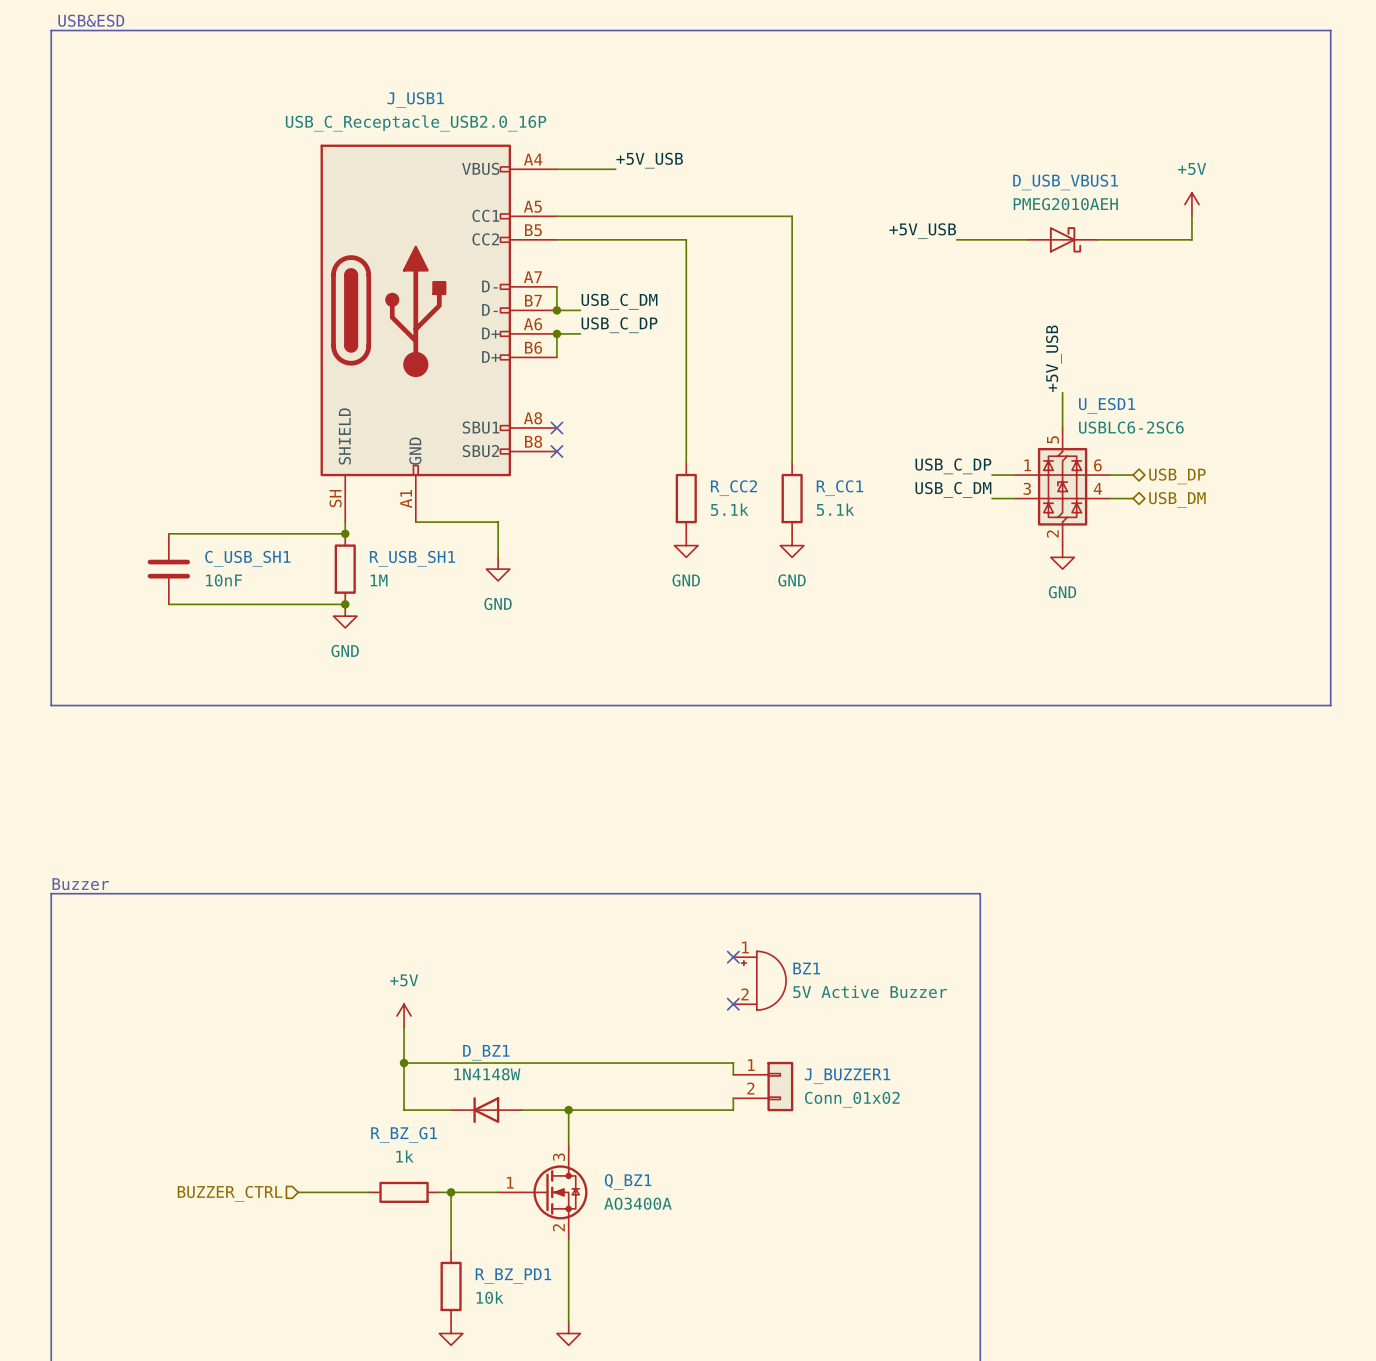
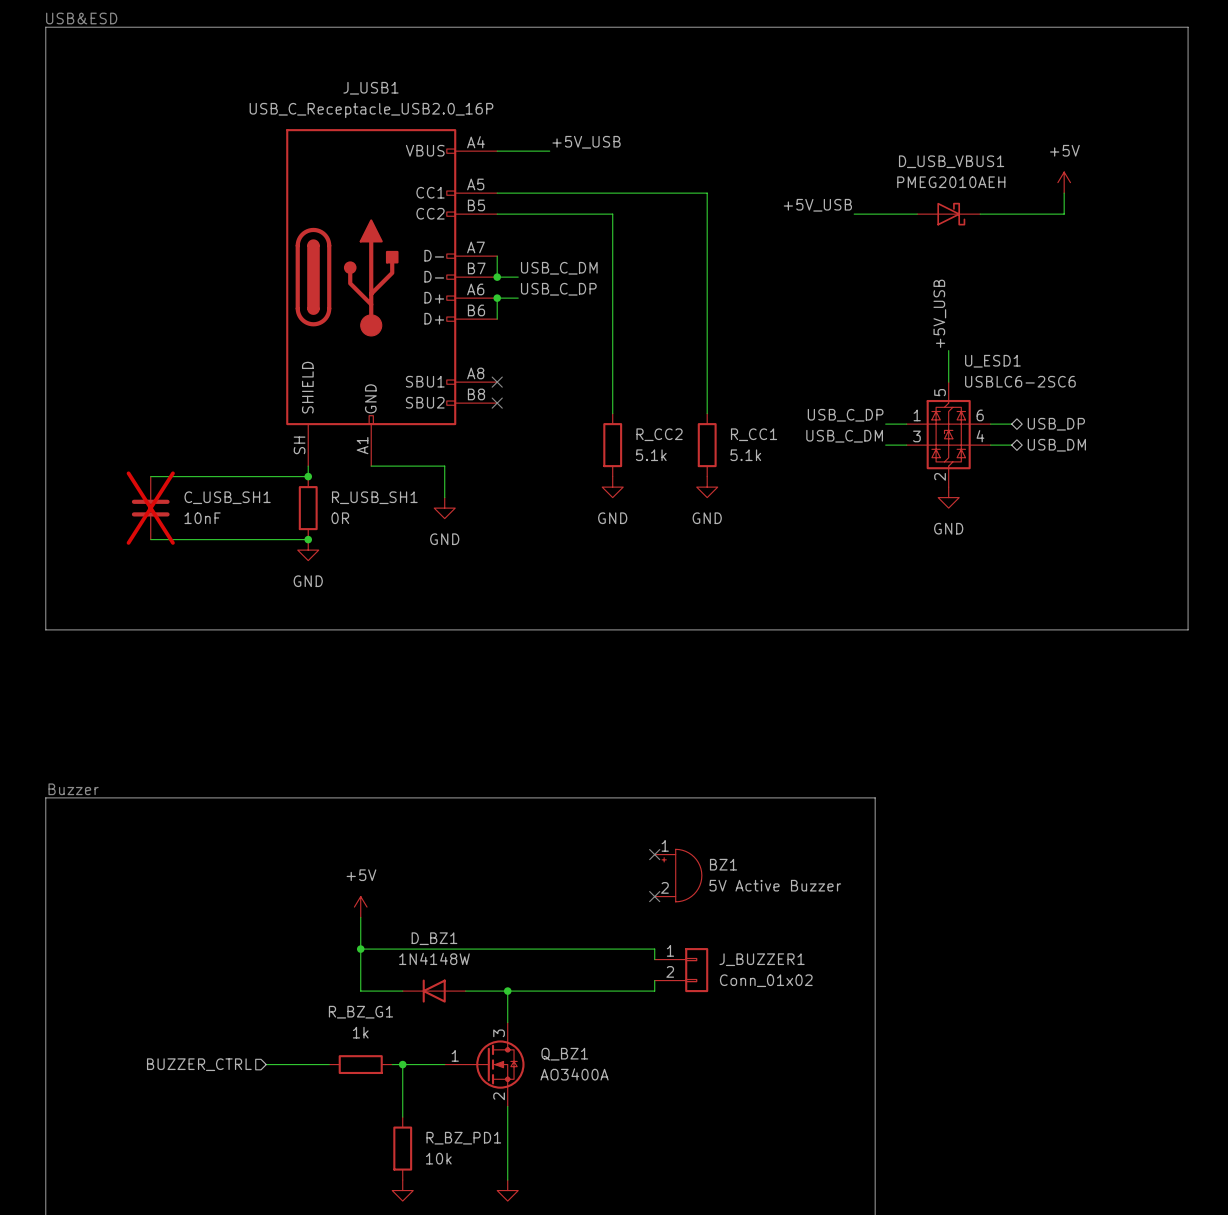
C_USB_SH1 do-not-place cross: none -> (150, 508)
R_USB_SH1 value: 1M (379, 580) -> 0R (340, 518)

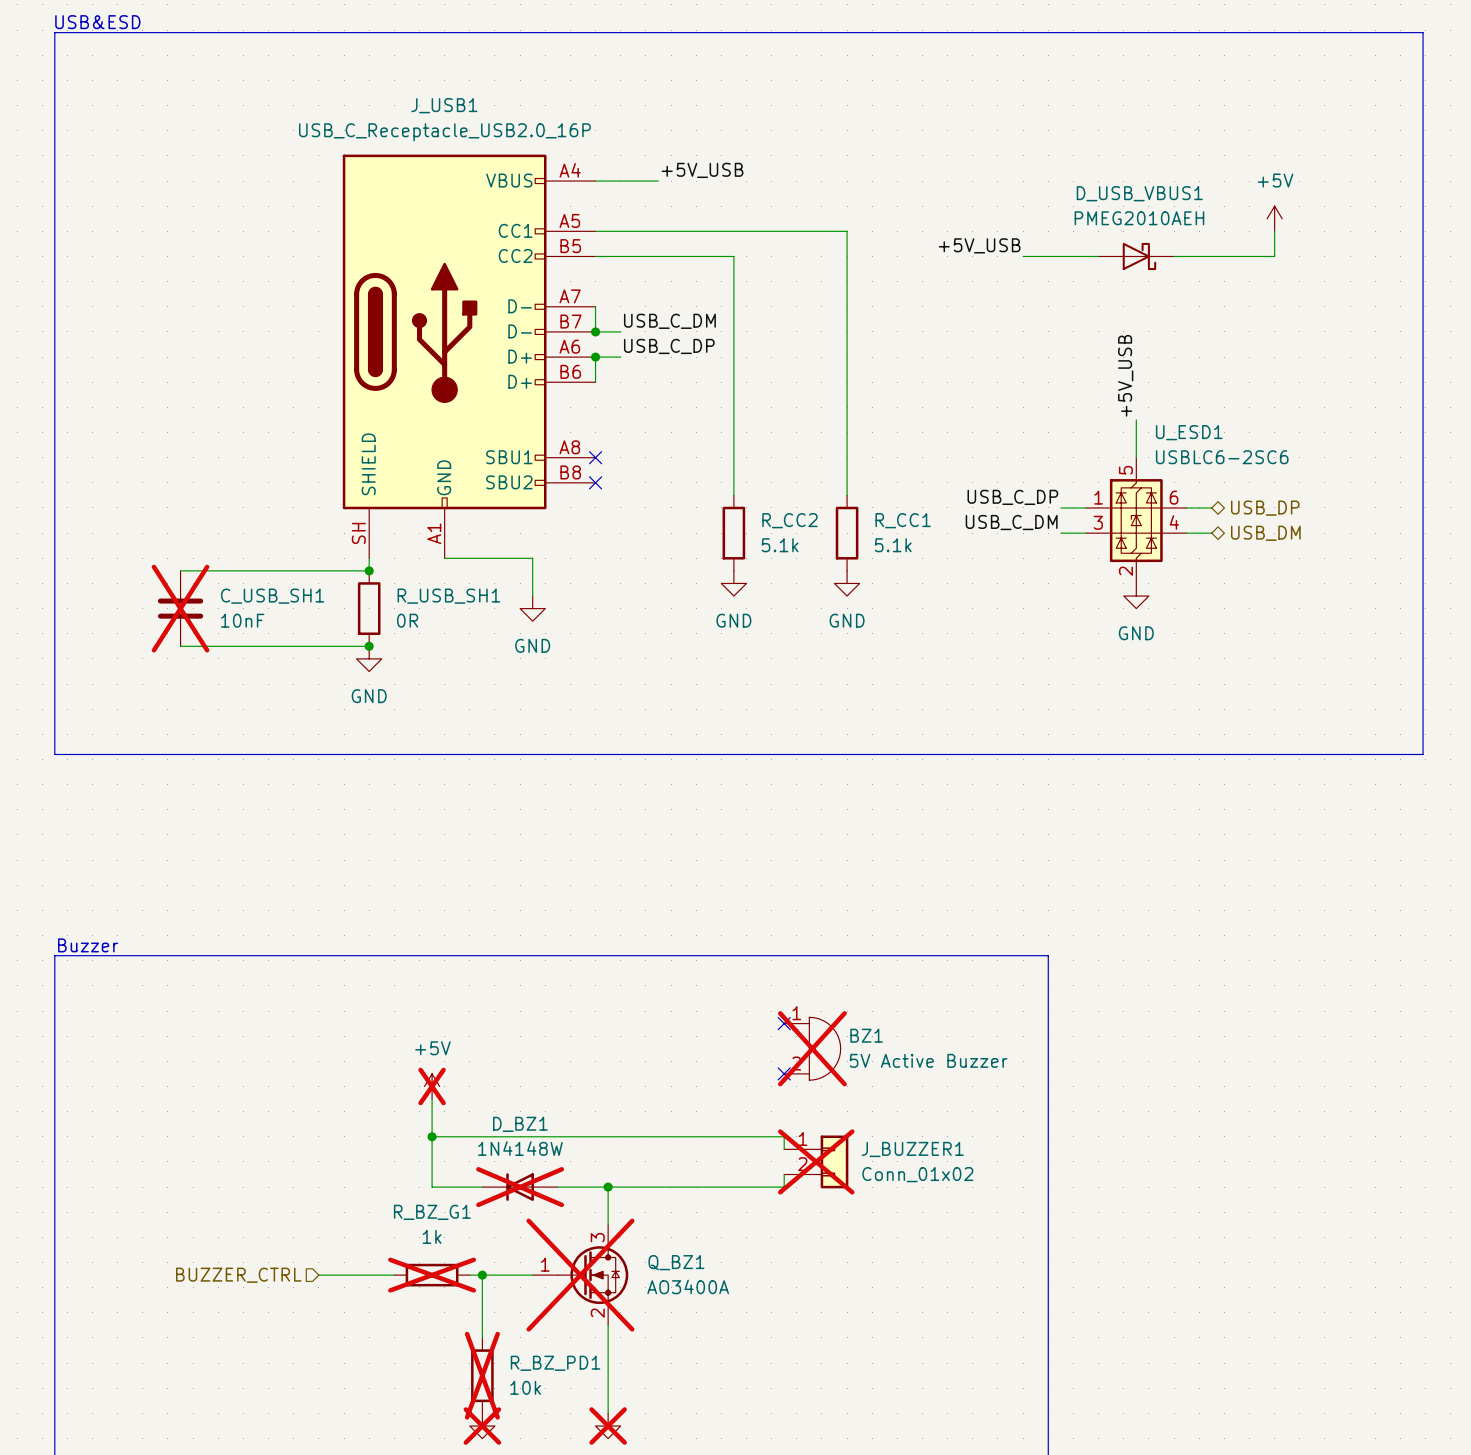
BZ1 do-not-place cross: none -> (812, 1048)
power symbol do-not-place cross: none -> (432, 1086)
J_BUZZER1 do-not-place cross: none -> (816, 1161)
D_BZ1 do-not-place cross: none -> (520, 1187)
R_BZ_G1 do-not-place cross: none -> (432, 1275)
Q_BZ1 do-not-place cross: none -> (580, 1275)
R_BZ_PD1 do-not-place cross: none -> (482, 1375)
power symbol do-not-place cross: none -> (482, 1426)
power symbol do-not-place cross: none -> (608, 1426)

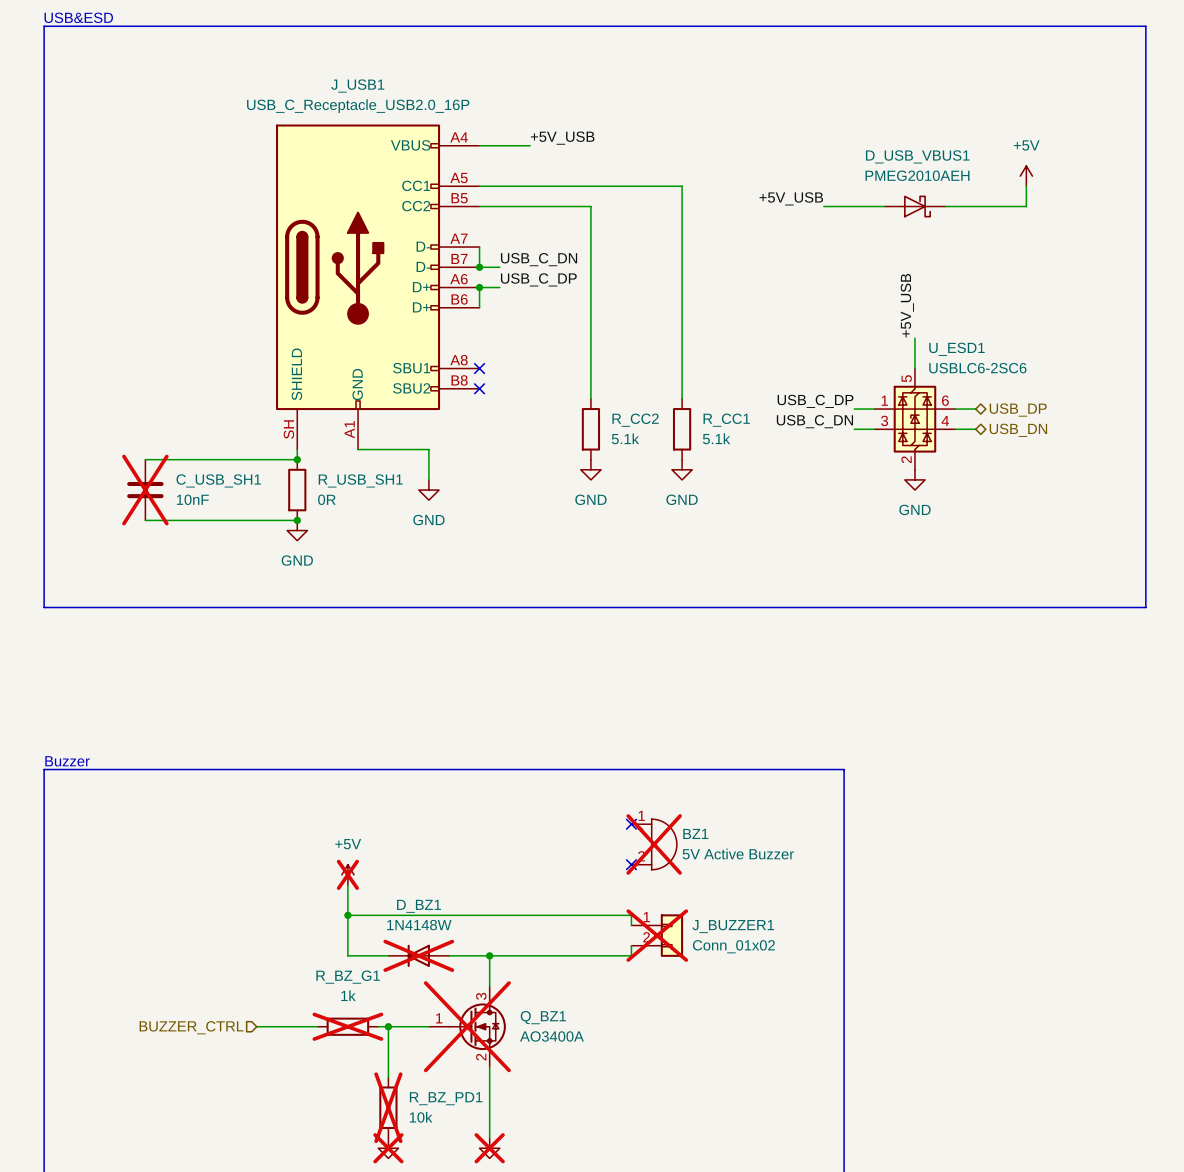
label: USB_C_DM (669, 321) -> USB_C_DN (539, 259)
label: USB_C_DM (1011, 522) -> USB_C_DN (814, 421)
hierarchical label: USB_DM (1265, 533) -> USB_DN (1018, 430)

